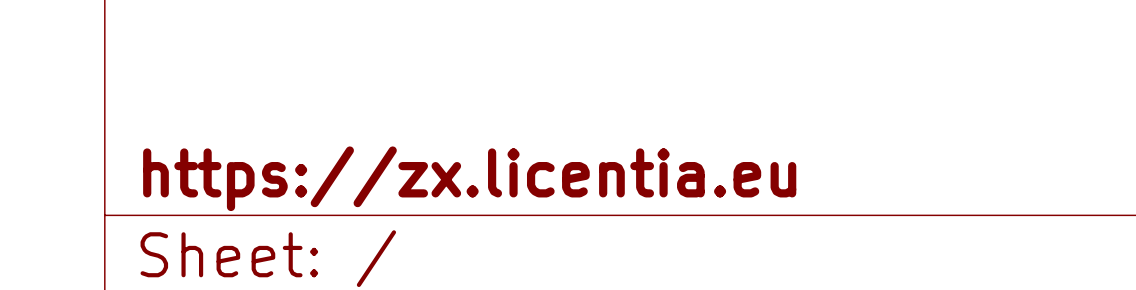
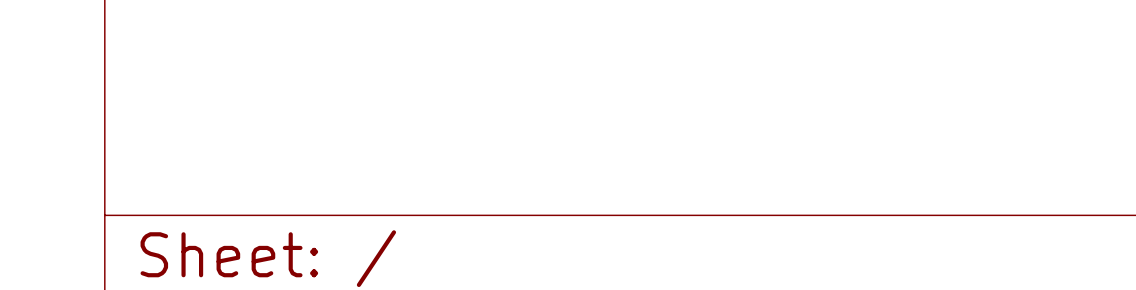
title block: https://zx.licentia.eu (469, 178) -> none

